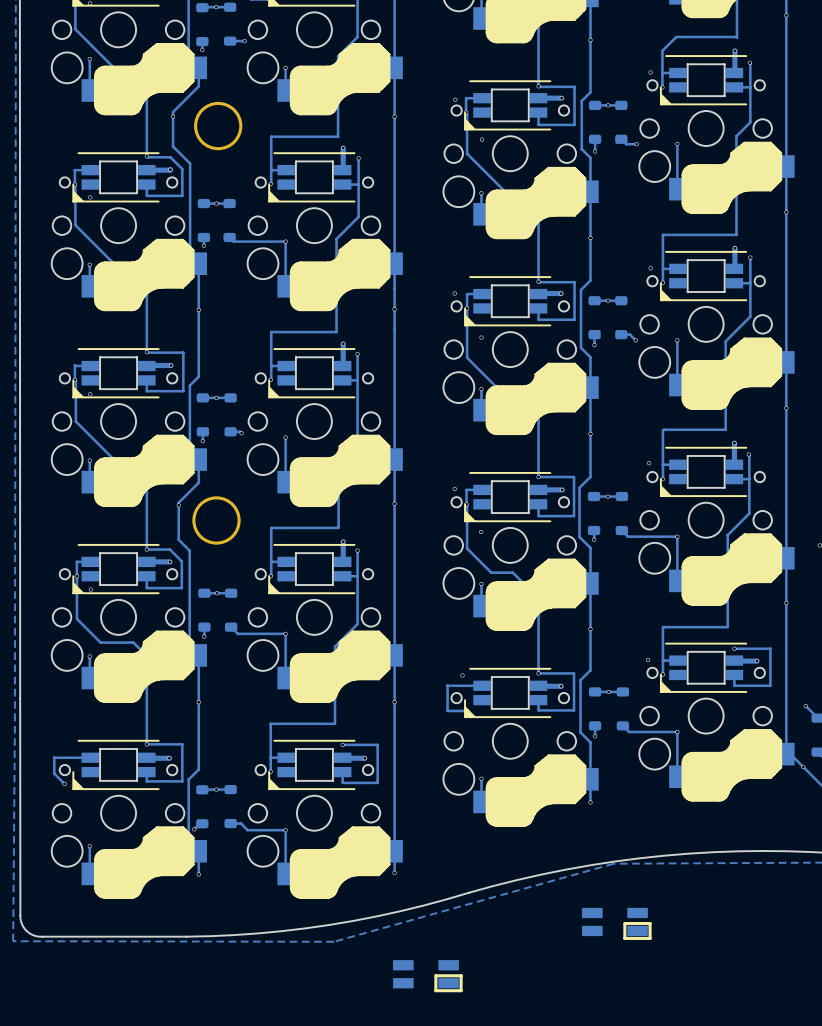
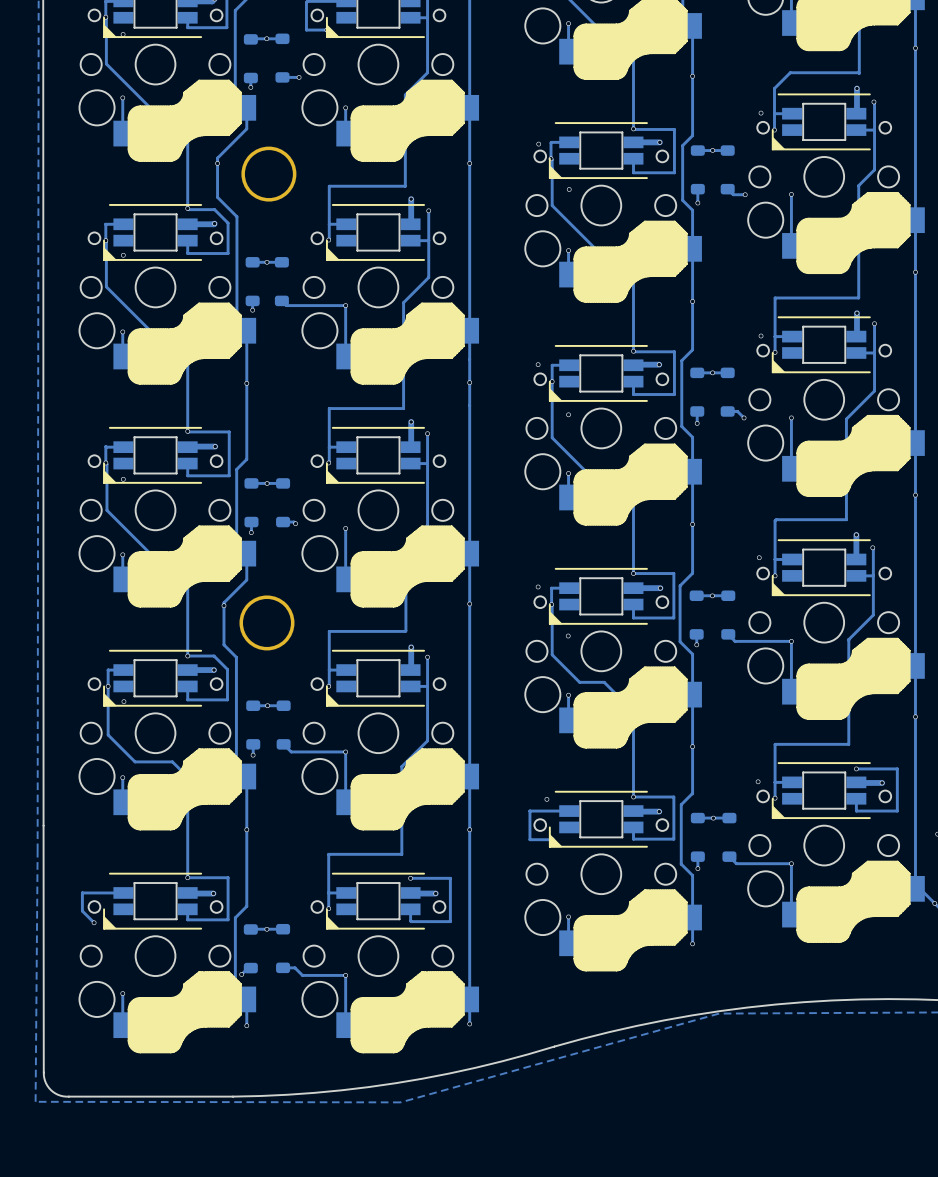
part: (616, 923) -> none
part: (427, 976) -> none

